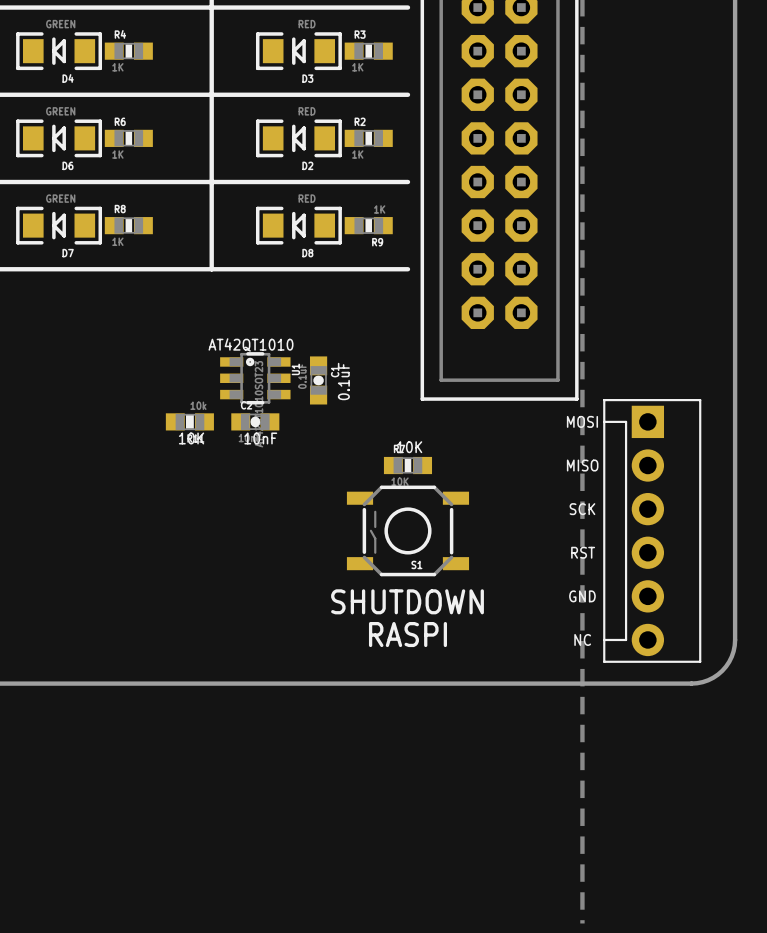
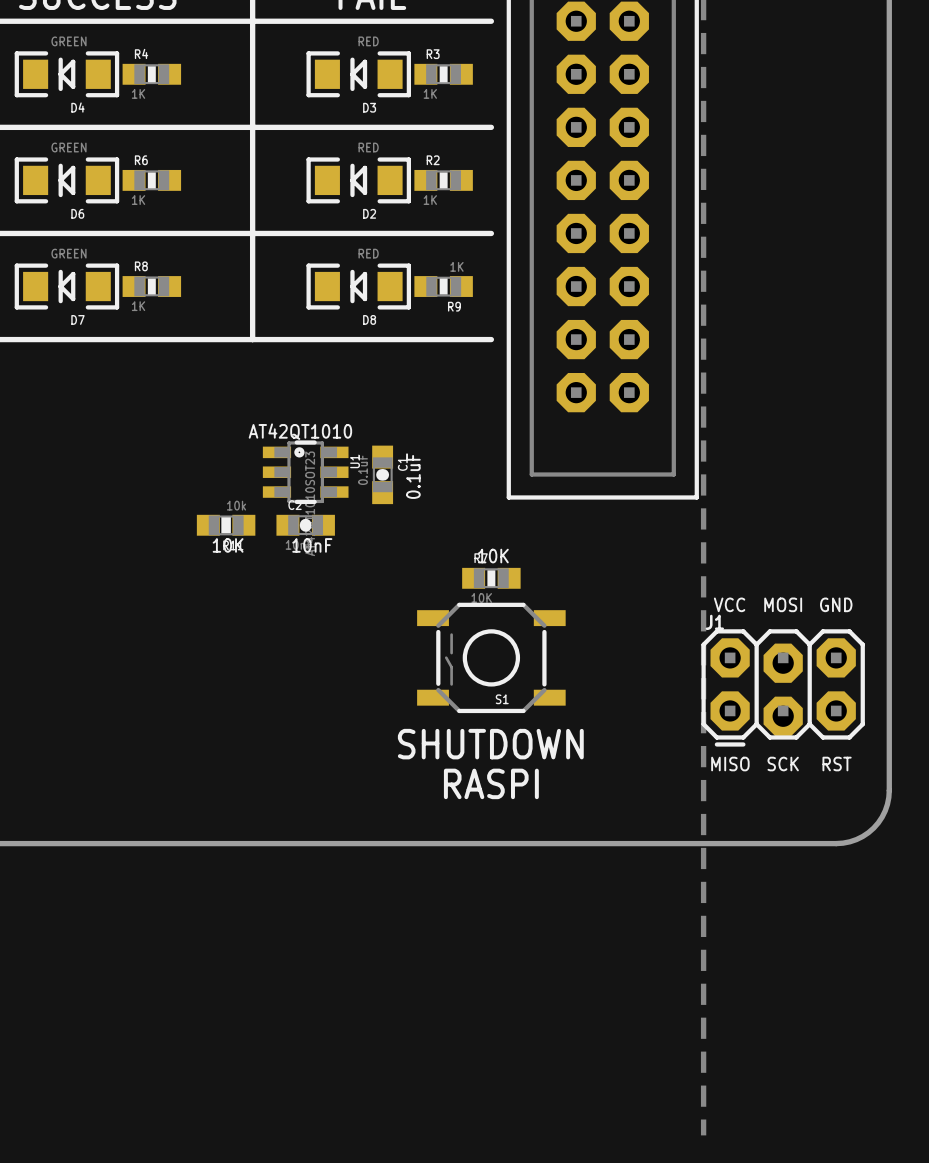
text position: MOSI (582, 421) -> MOSI (783, 604)
text position: MISO (582, 465) -> MISO (730, 764)
text: none -> VCC (729, 604)
text position: SCK (582, 509) -> SCK (783, 764)
part: (652, 530) -> none
text position: RST (583, 552) -> RST (837, 764)
J1: none -> (783, 687)
text position: GND (582, 596) -> GND (836, 604)
text: NC (582, 639) -> none

